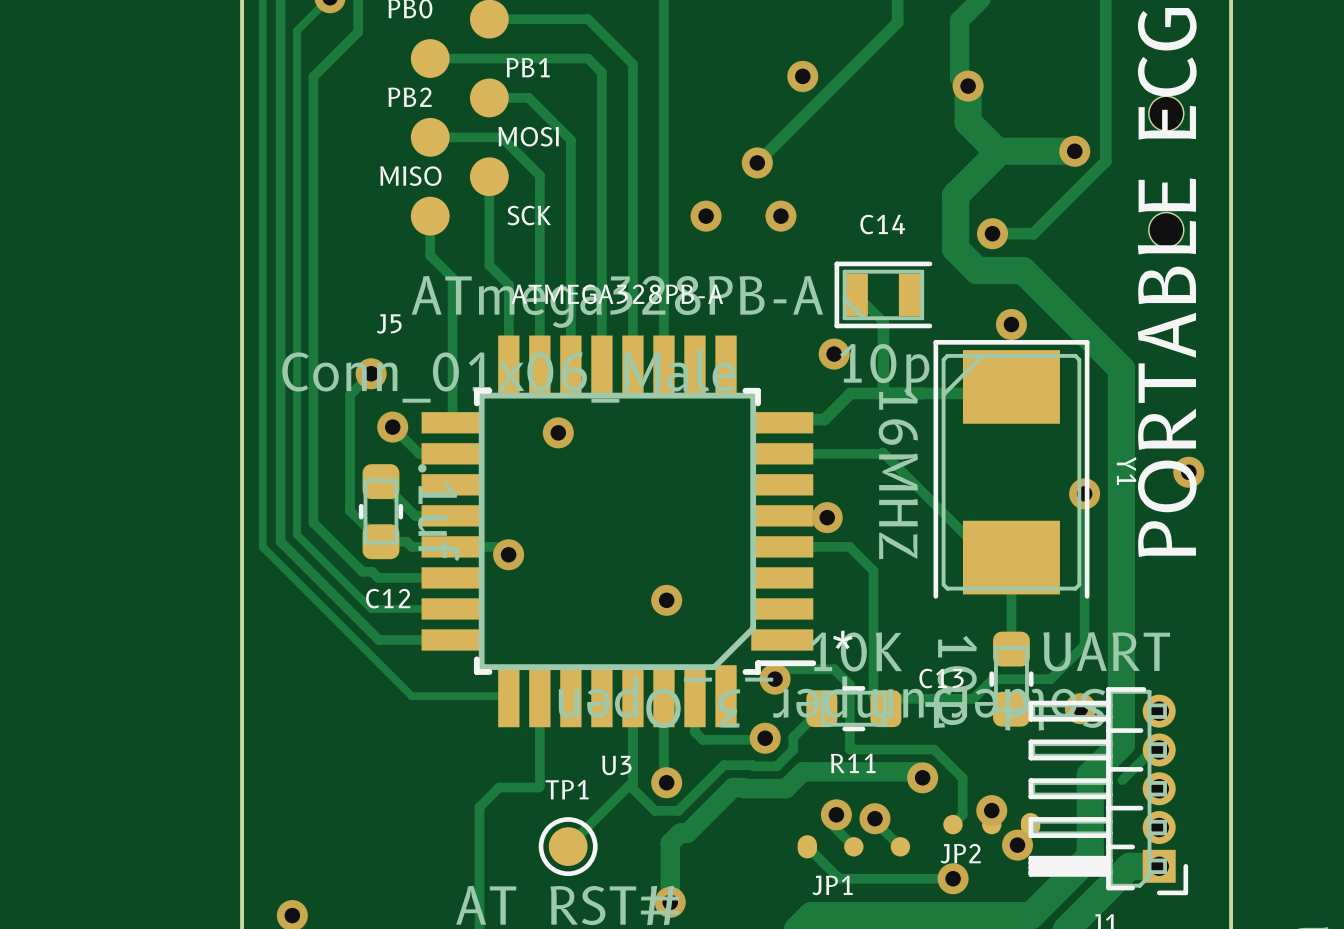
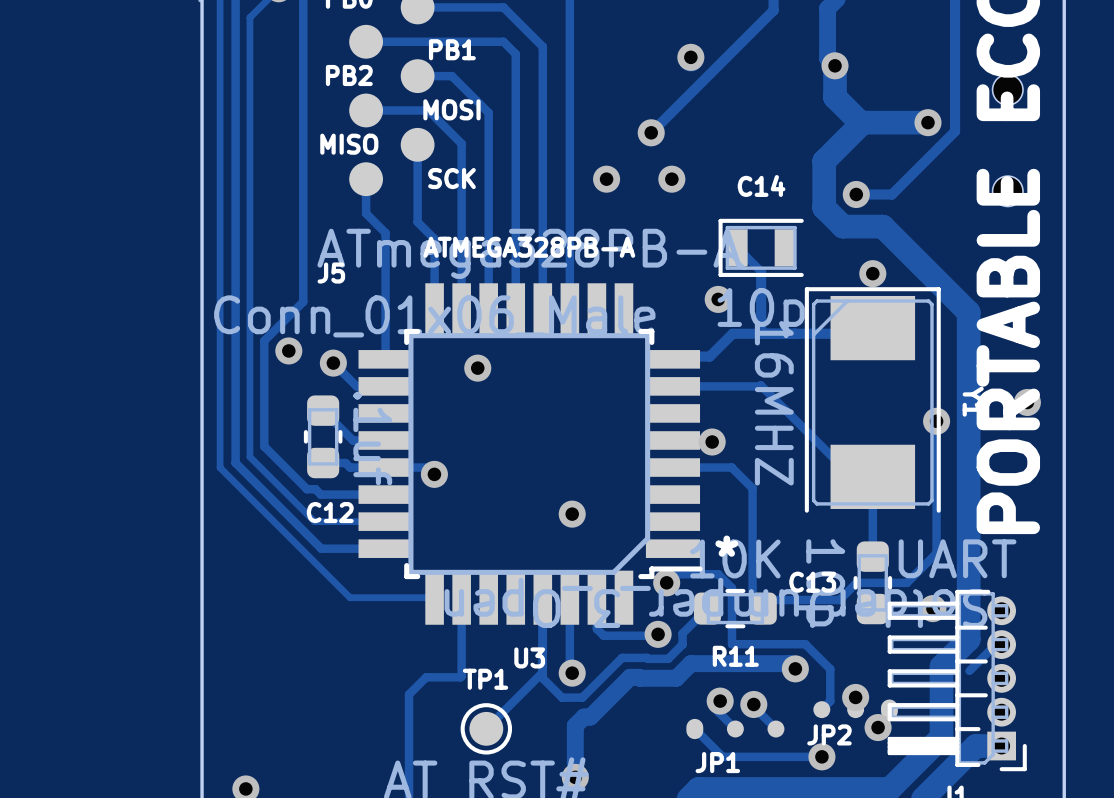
track: (358, 32) (313, 76) (313, 401) -> (303, 18) (303, 301) (264, 340)
track: (371, 373) (349, 394) (349, 510) (380, 541) -> none
via position: (371, 373) -> (288, 350)

